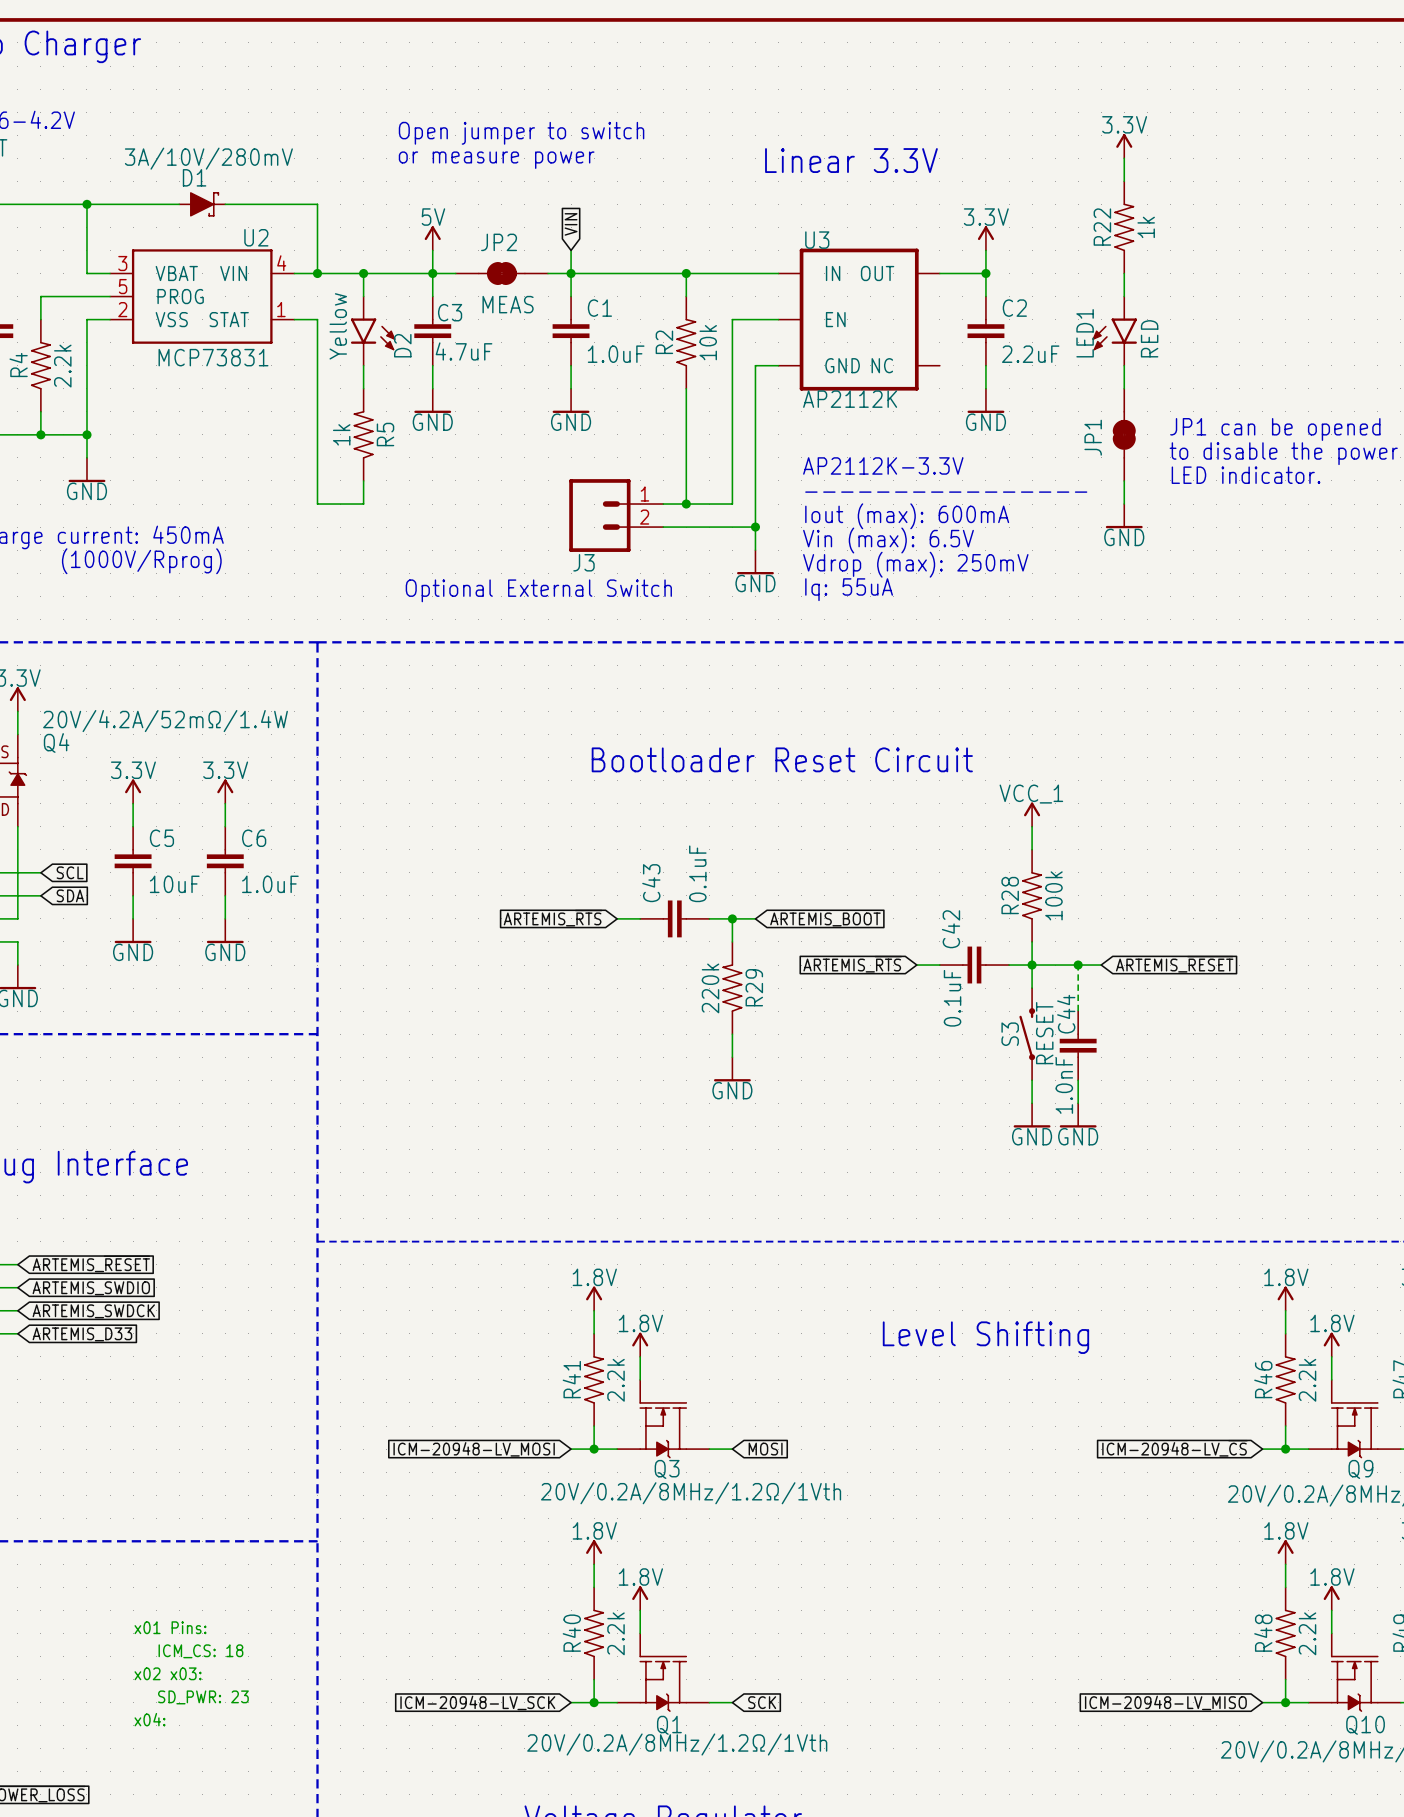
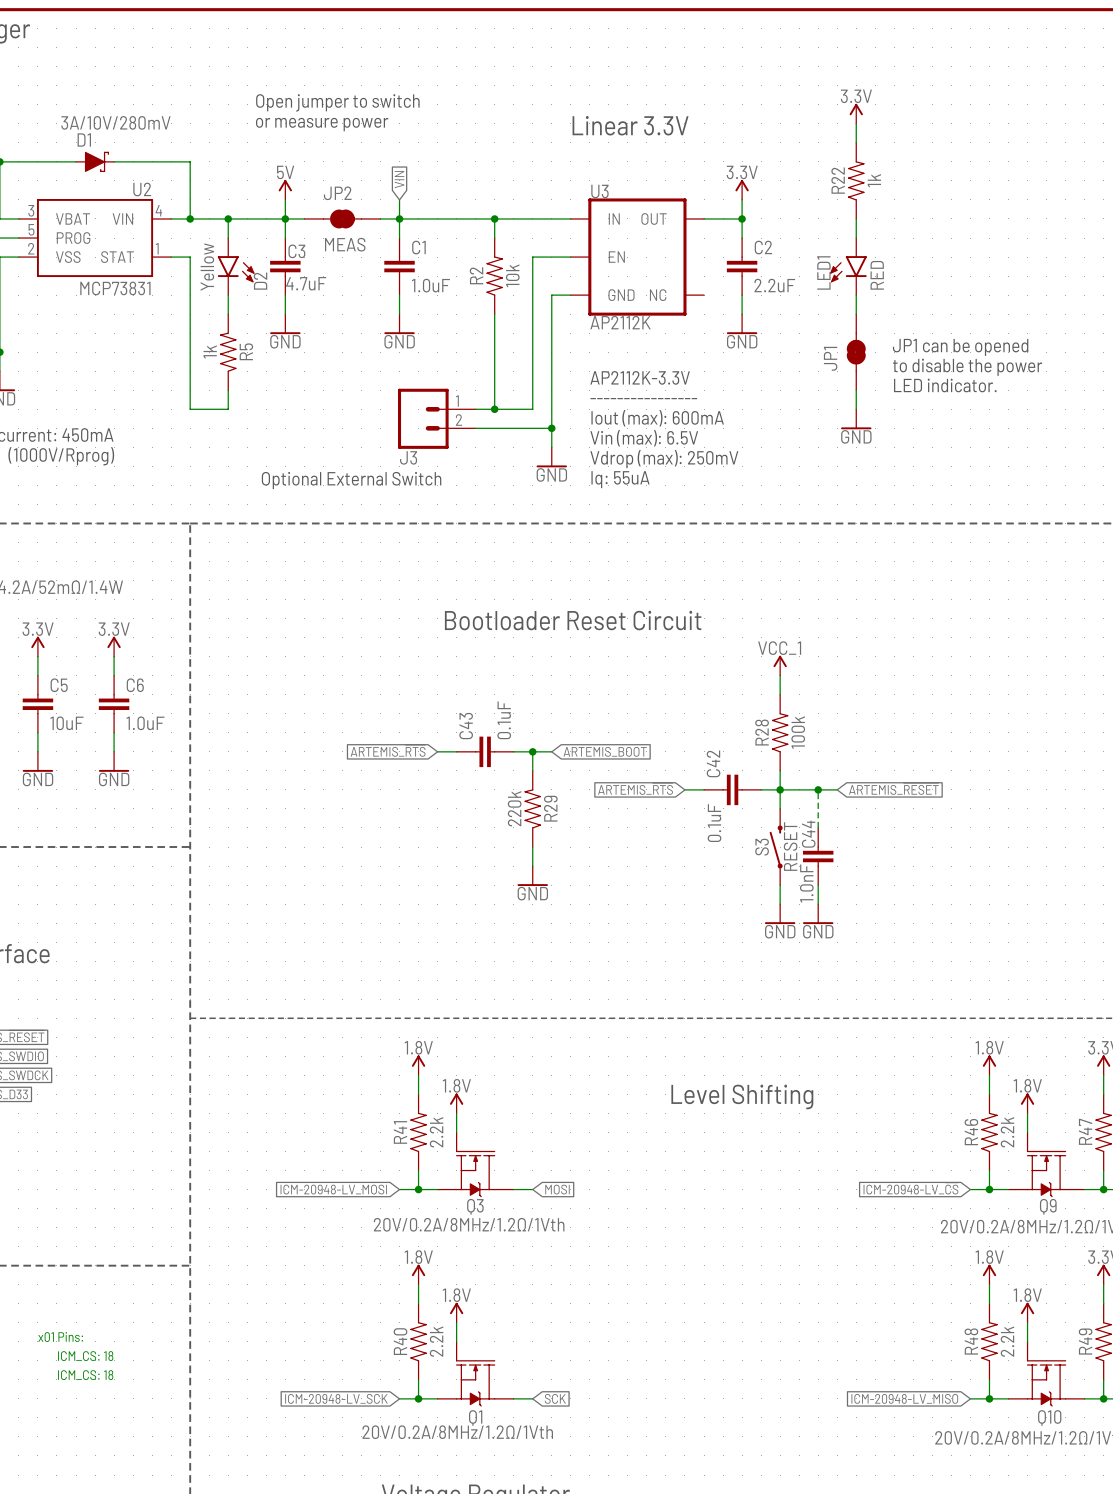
text: x02 x03: (168, 1673) -> none
text: none -> ICM_CS: 18 (85, 1375)
text: SD_PWR: 23 (203, 1697) -> none
text: x04: (150, 1719) -> none

